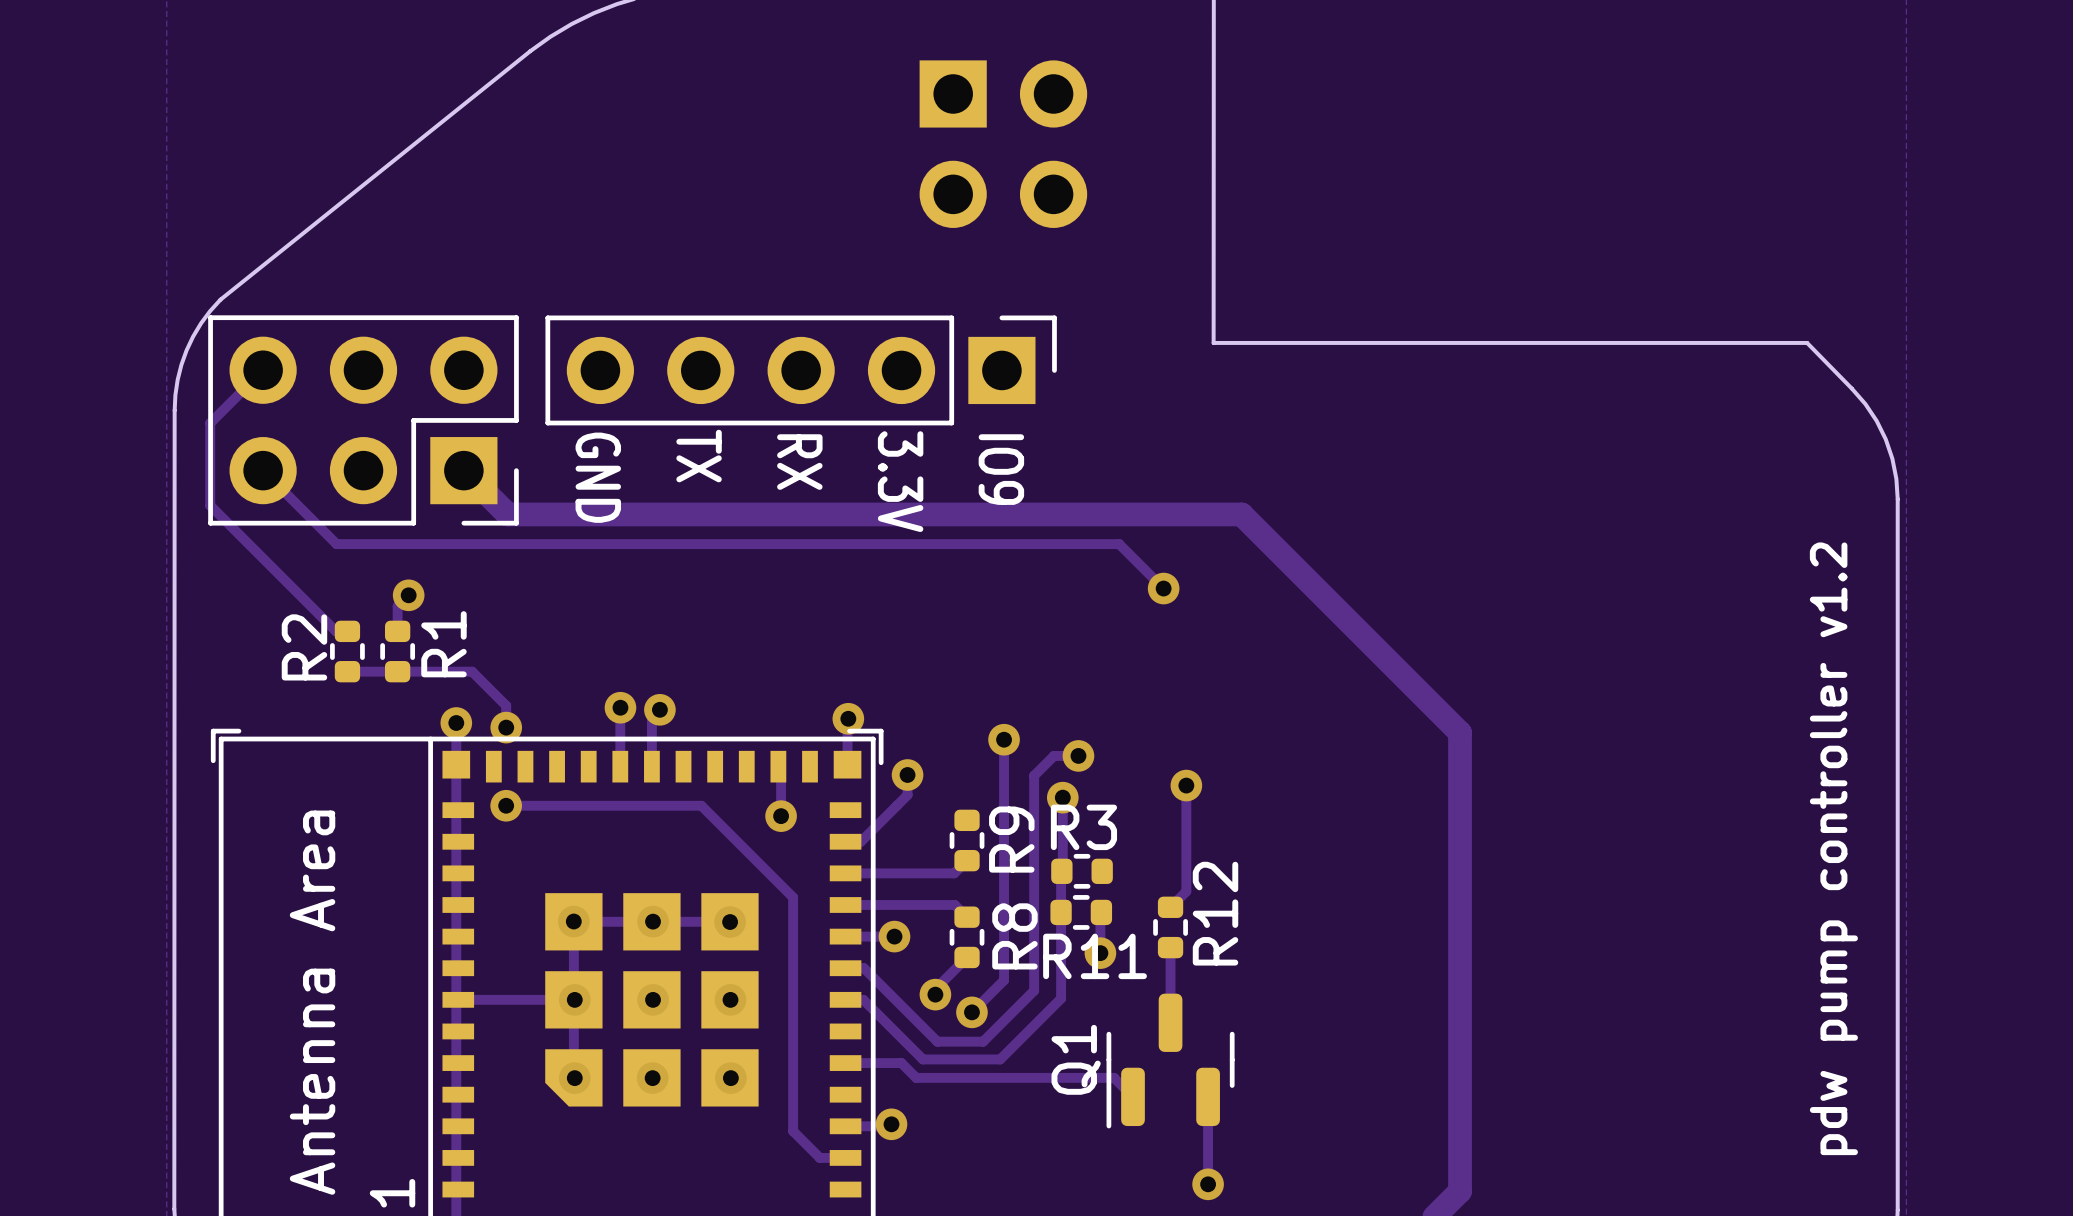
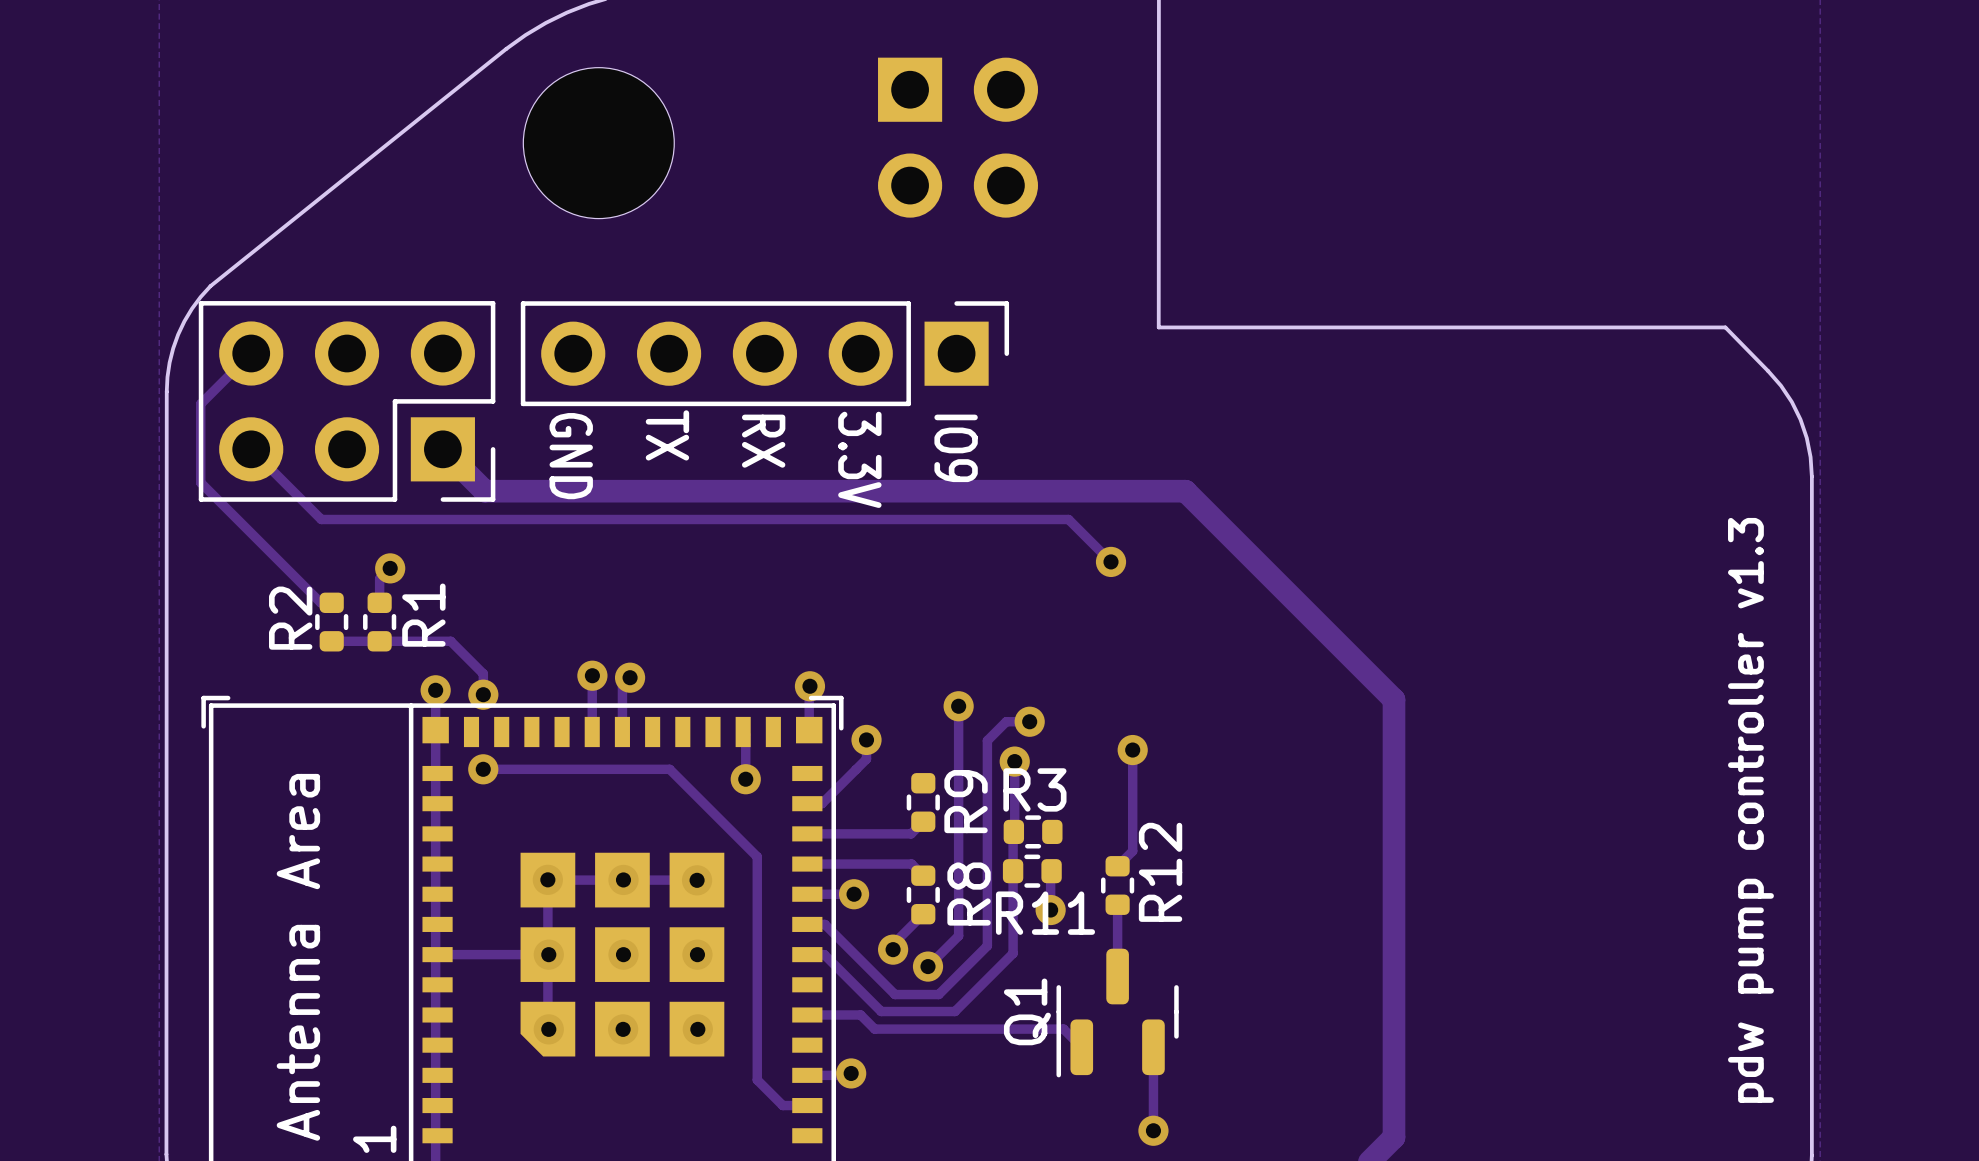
part: none -> (598, 143)
text: pdw pump controller v1.2 (1833, 848) -> pdw pump controller v1.3 (1750, 810)

